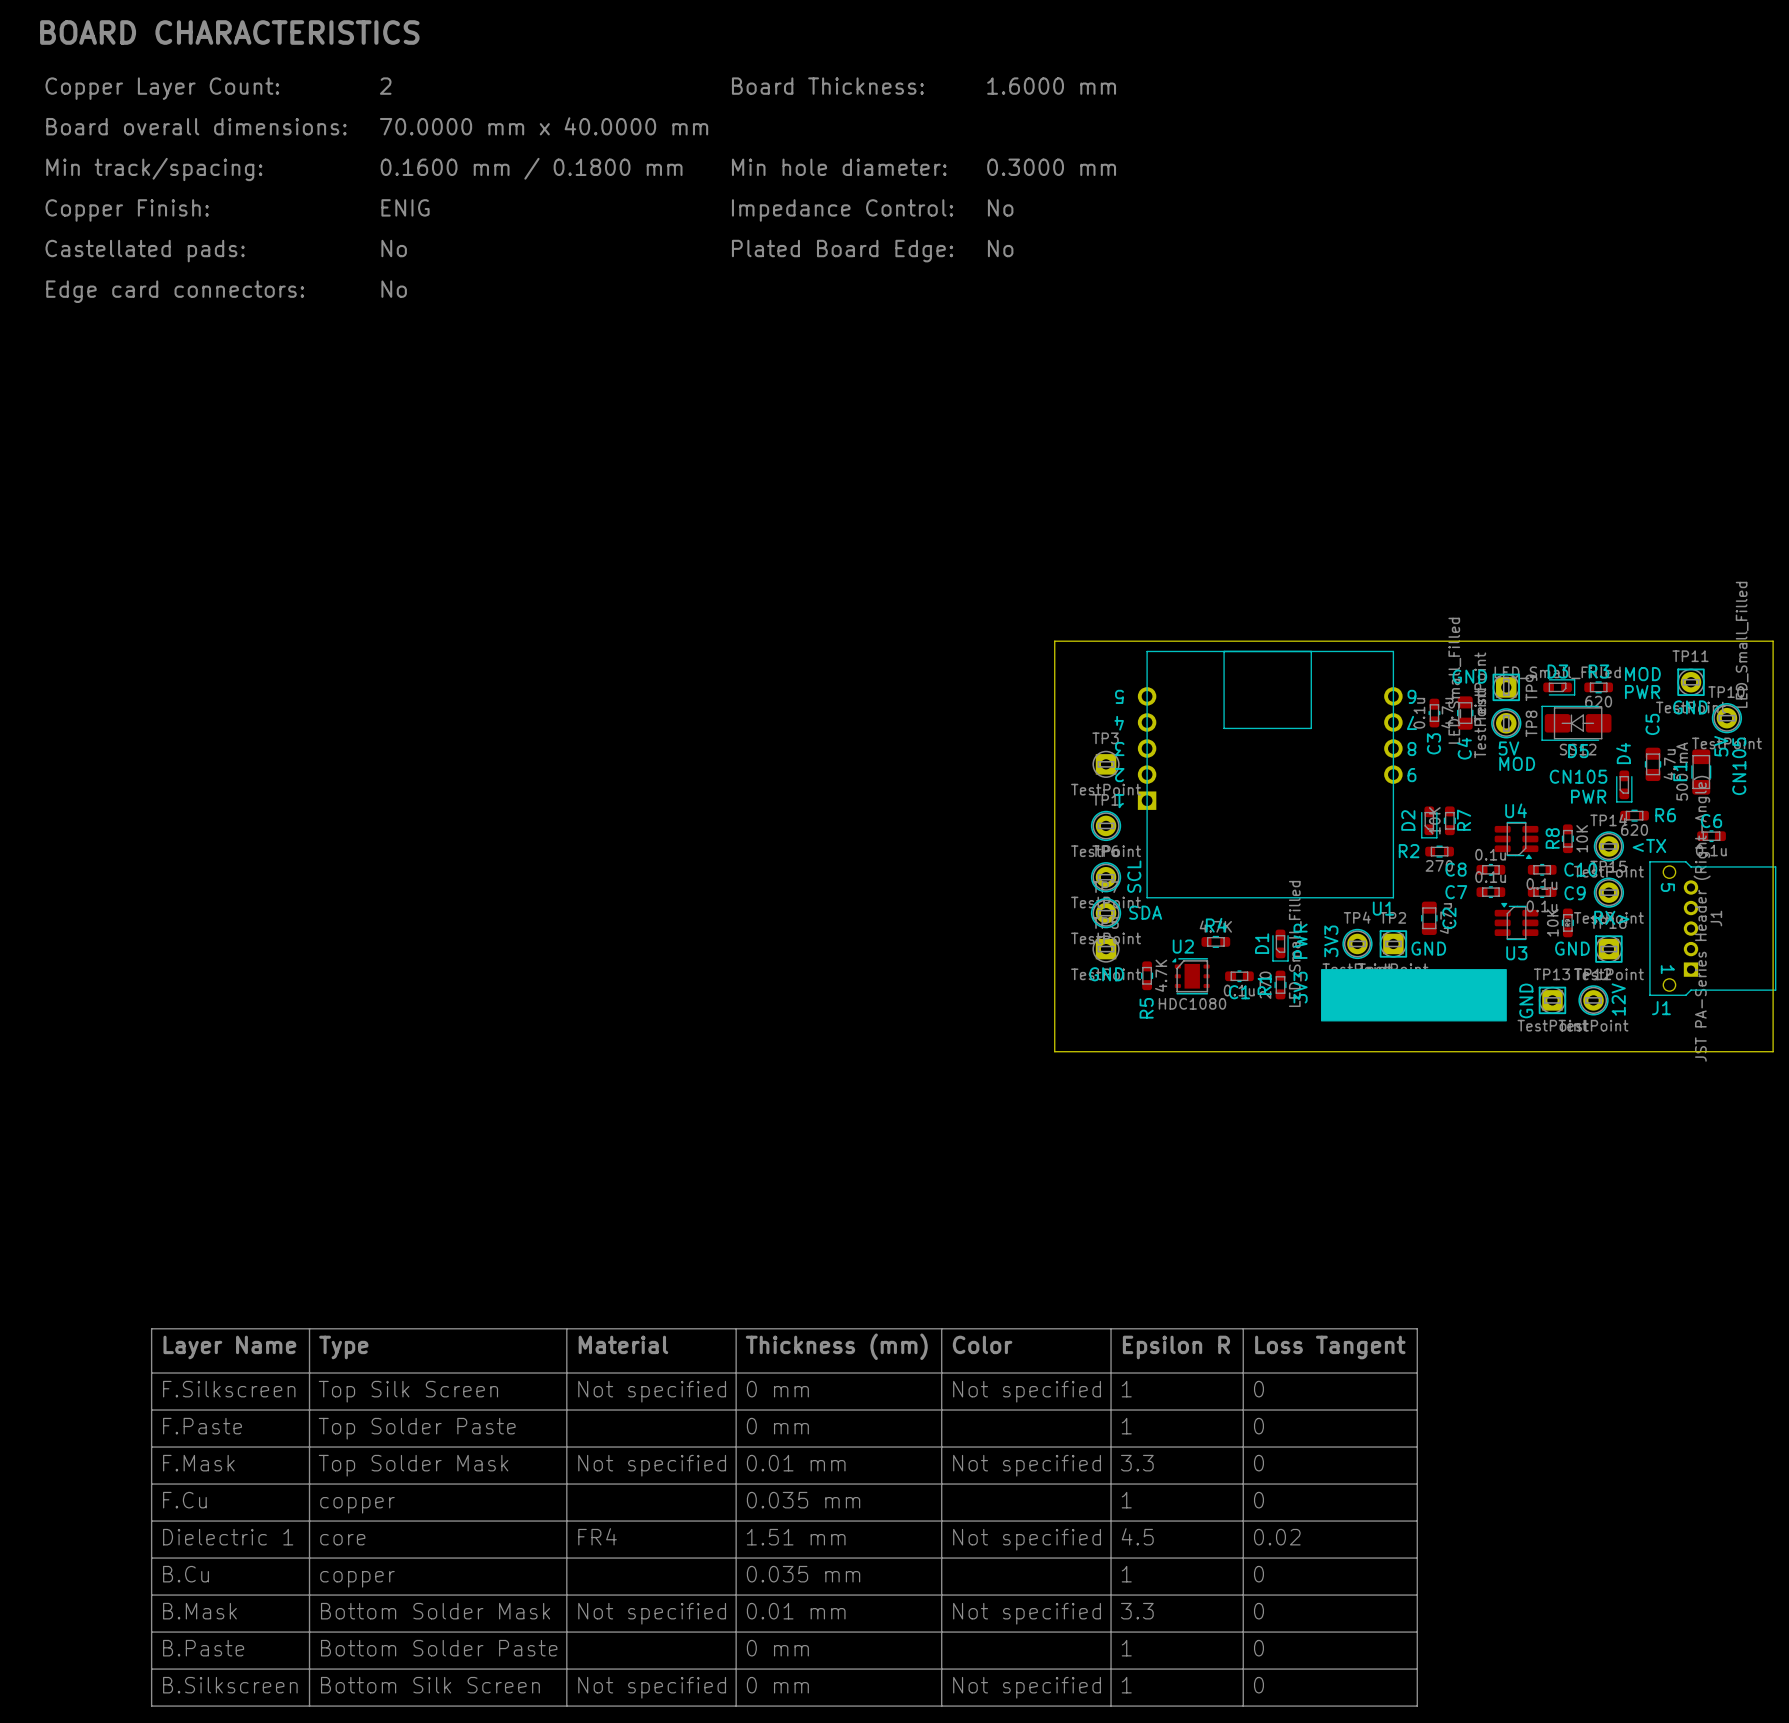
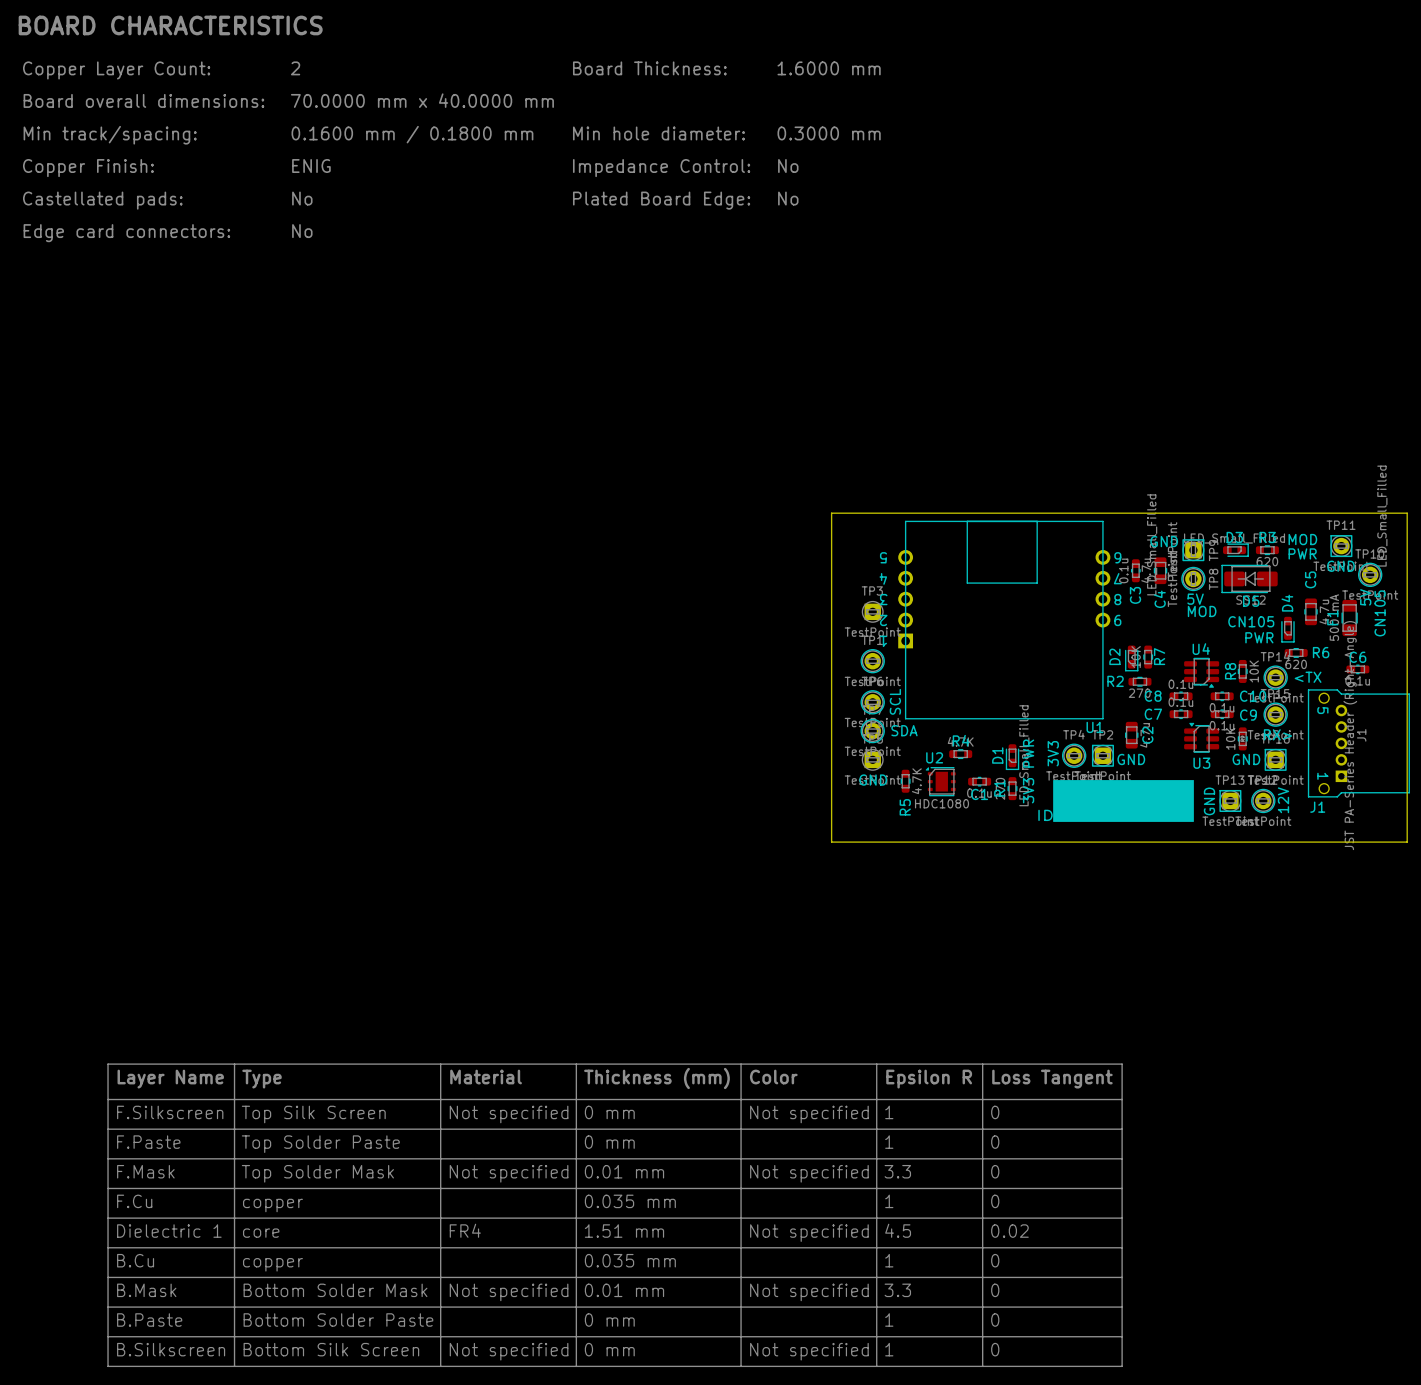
drawing shape: [1321, 969, 1507, 1022] -> [1053, 780, 1194, 822]
text: none -> ID (1045, 815)

